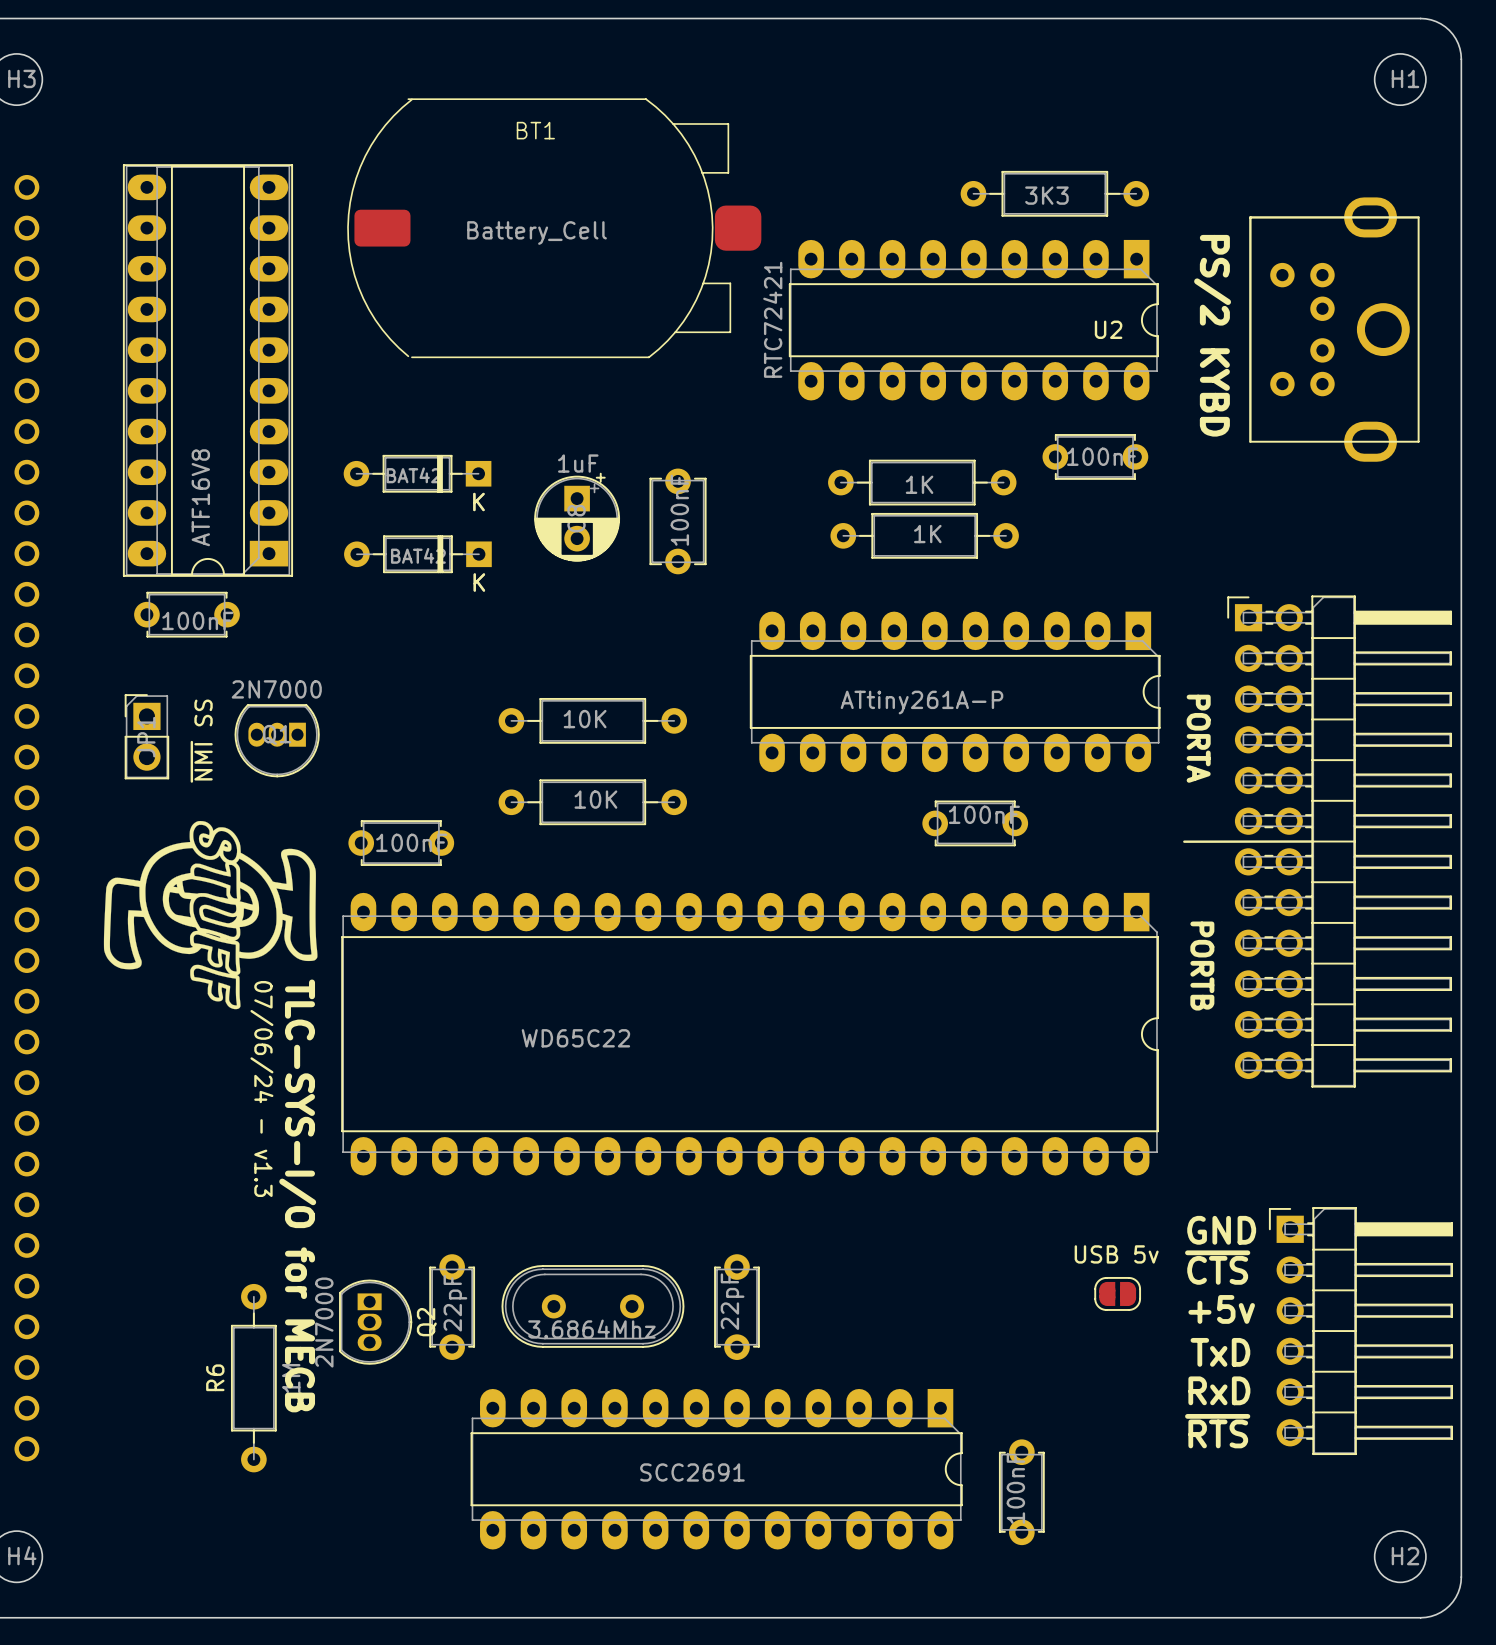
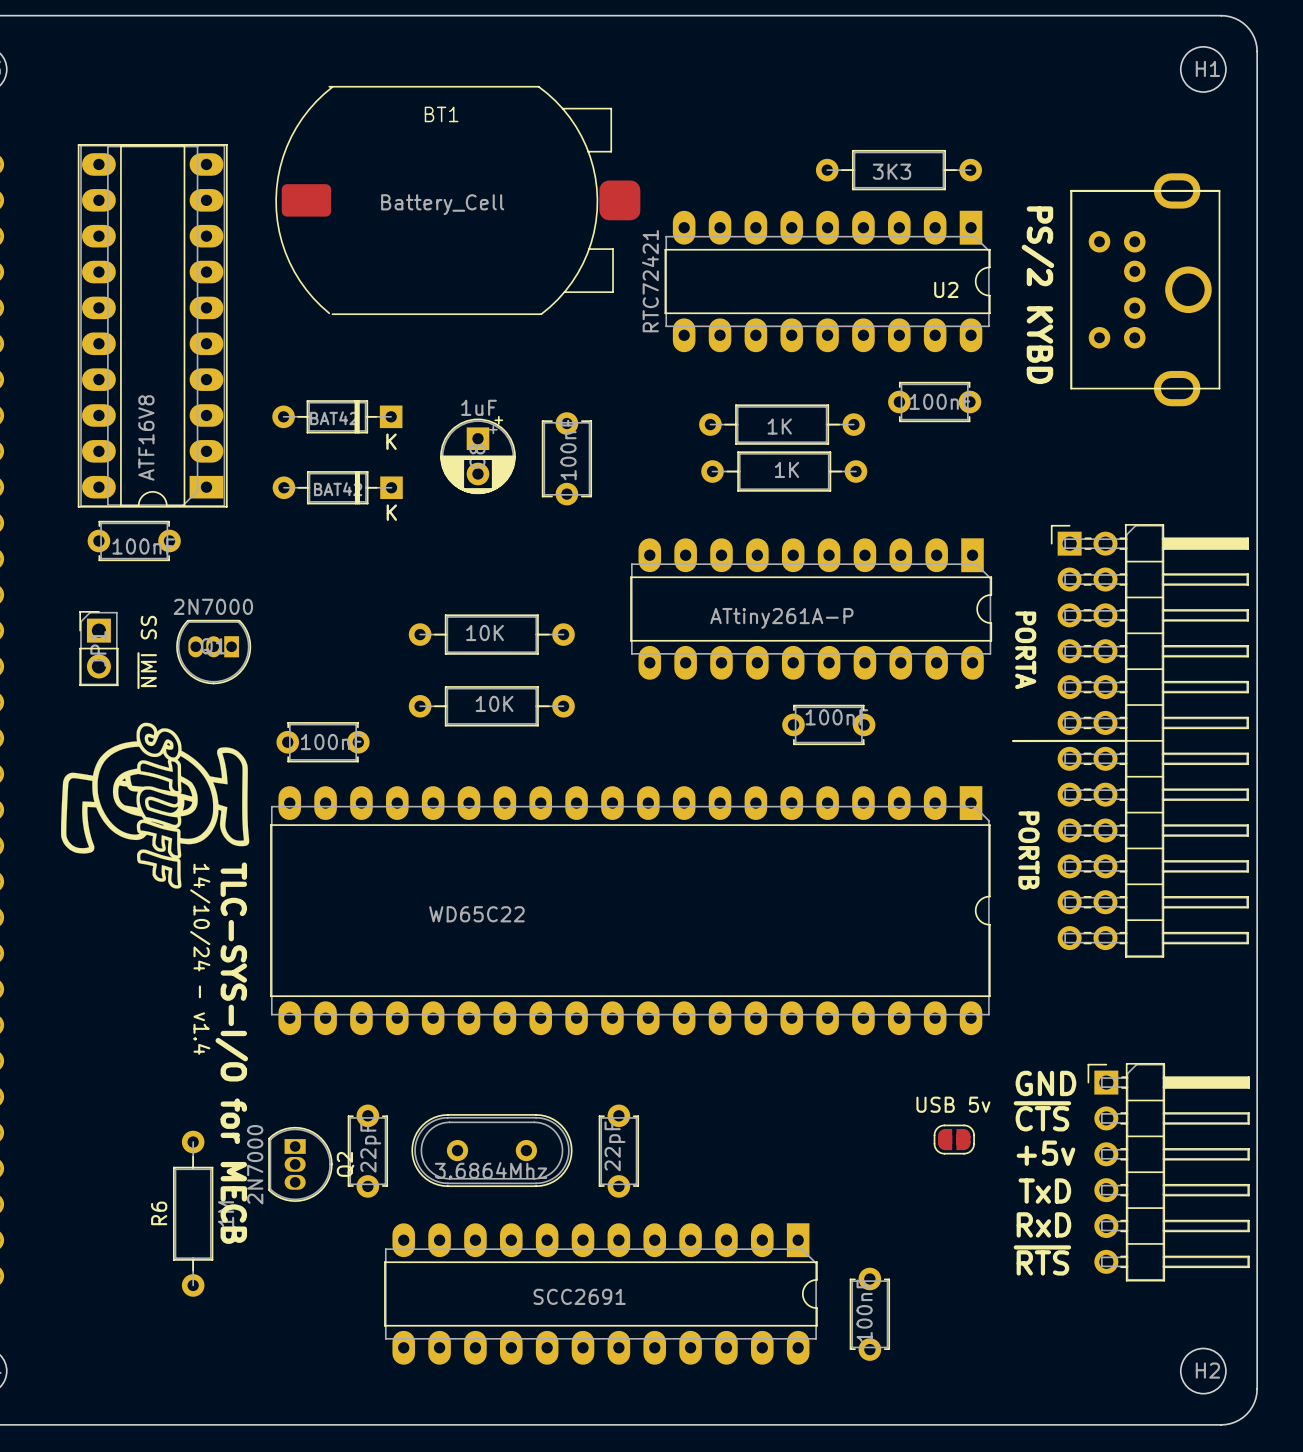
text: 07/06/24 - v1.3 (261, 1088) -> 14/10/24 - v1.4 (200, 959)

